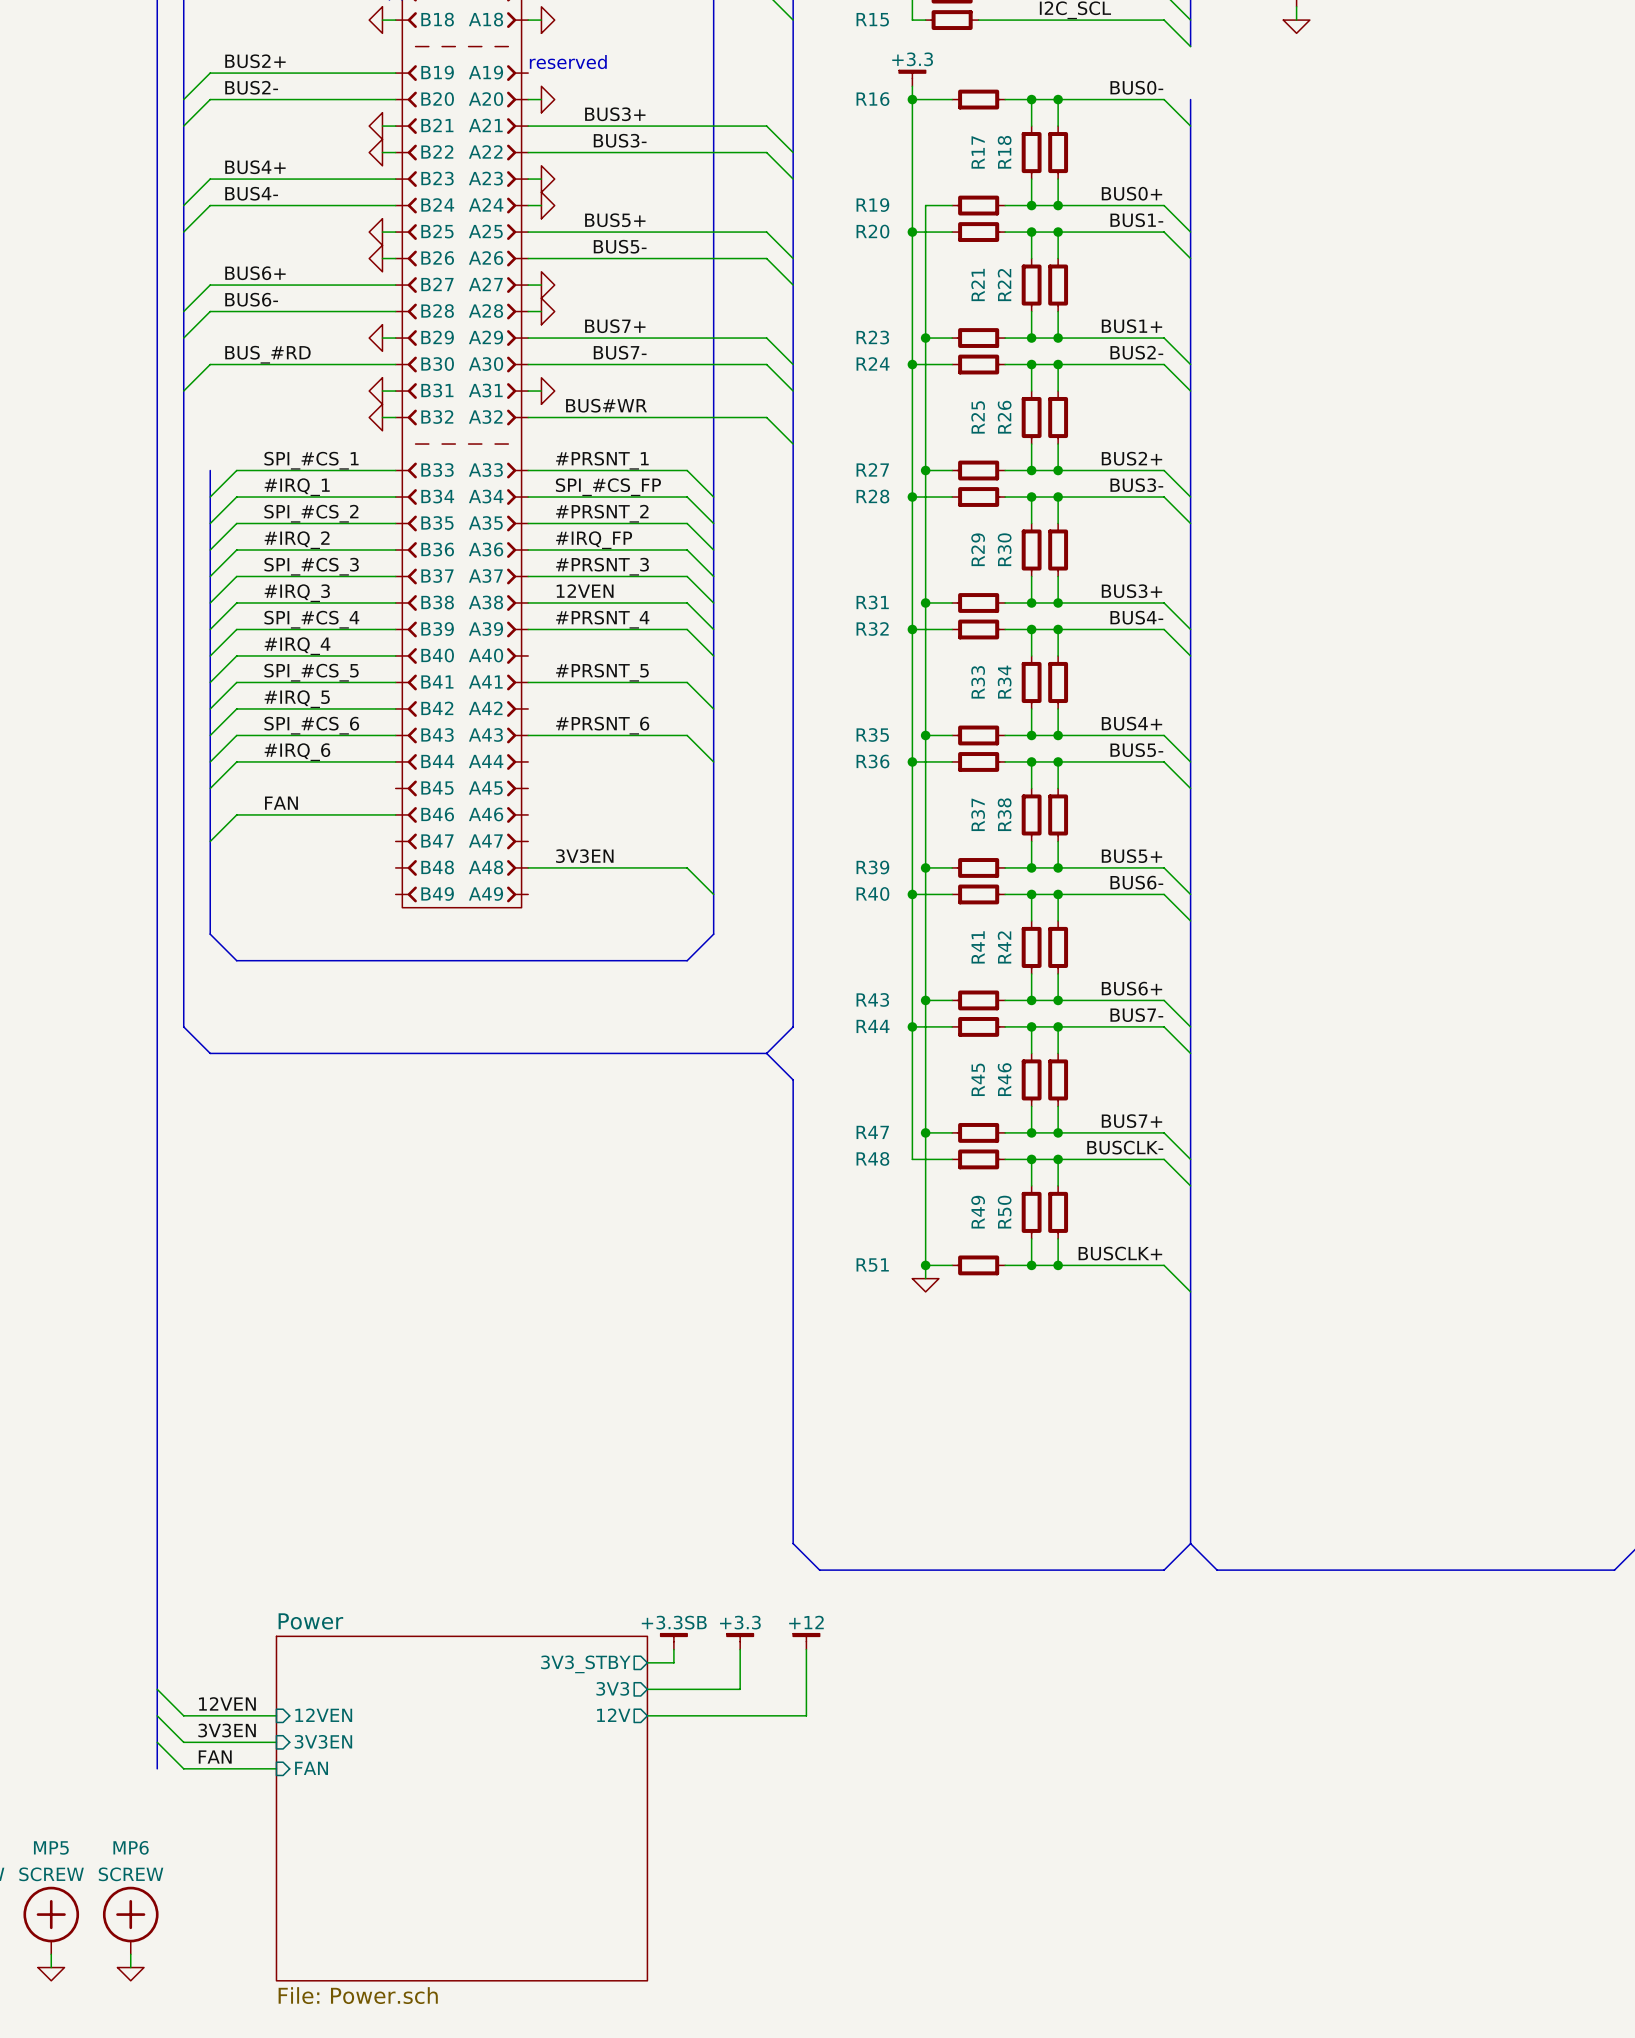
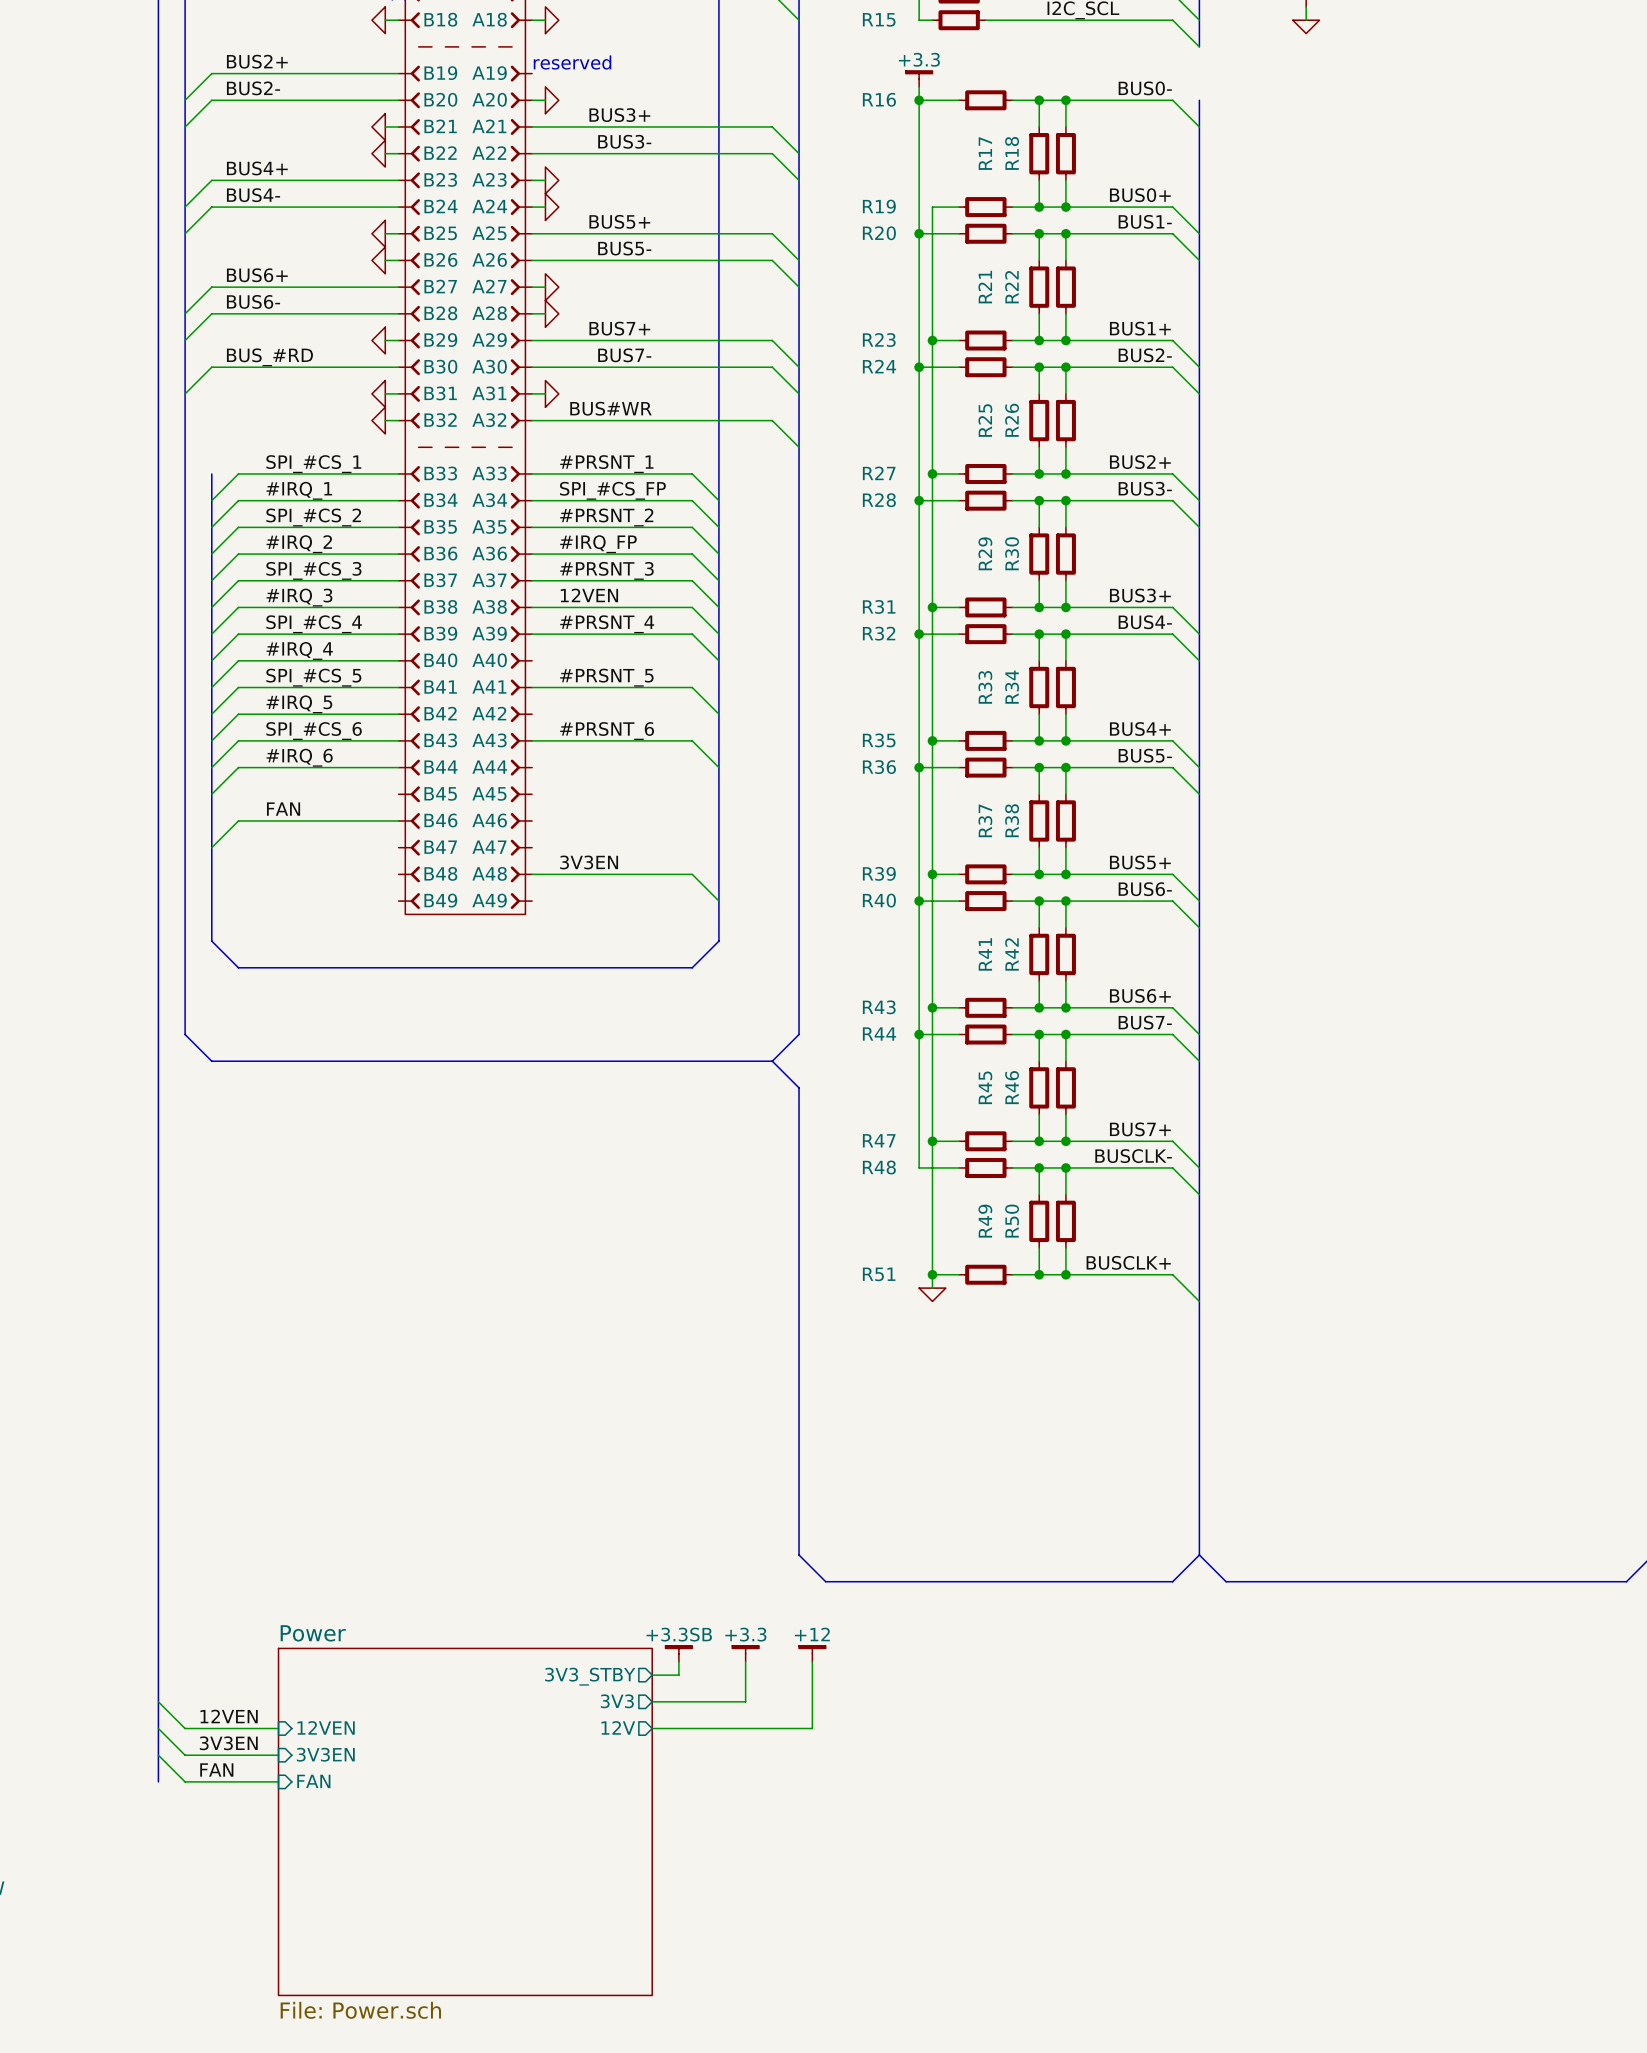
MP5: SCREW (51, 1920) -> none
MP6: SCREW (130, 1920) -> none
wire: (51, 1954) (51, 1967) -> none
wire: (130, 1954) (130, 1967) -> none
power symbol: (51, 1974) -> none
power symbol: (130, 1974) -> none

